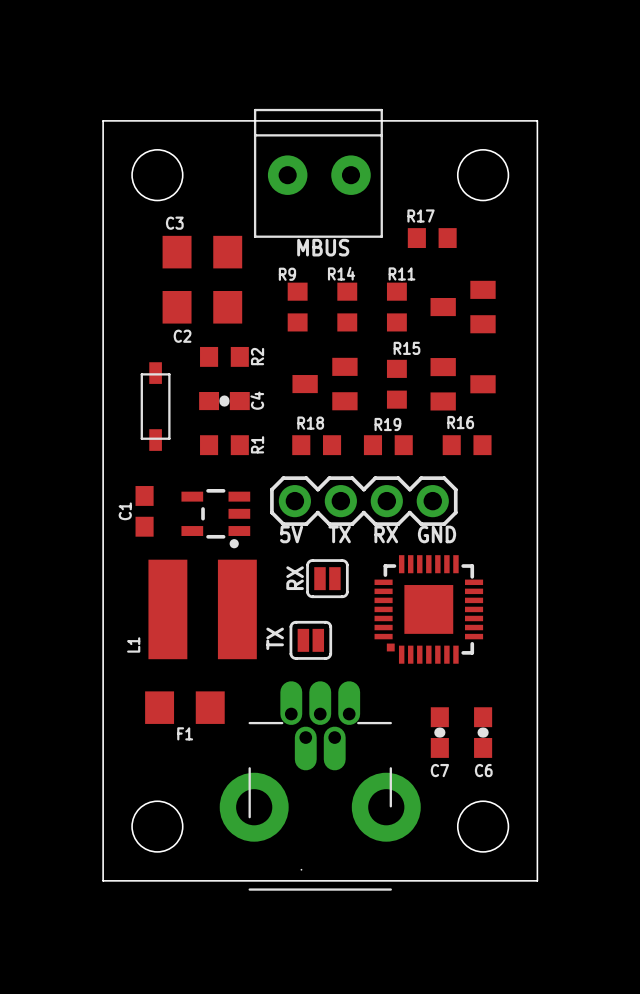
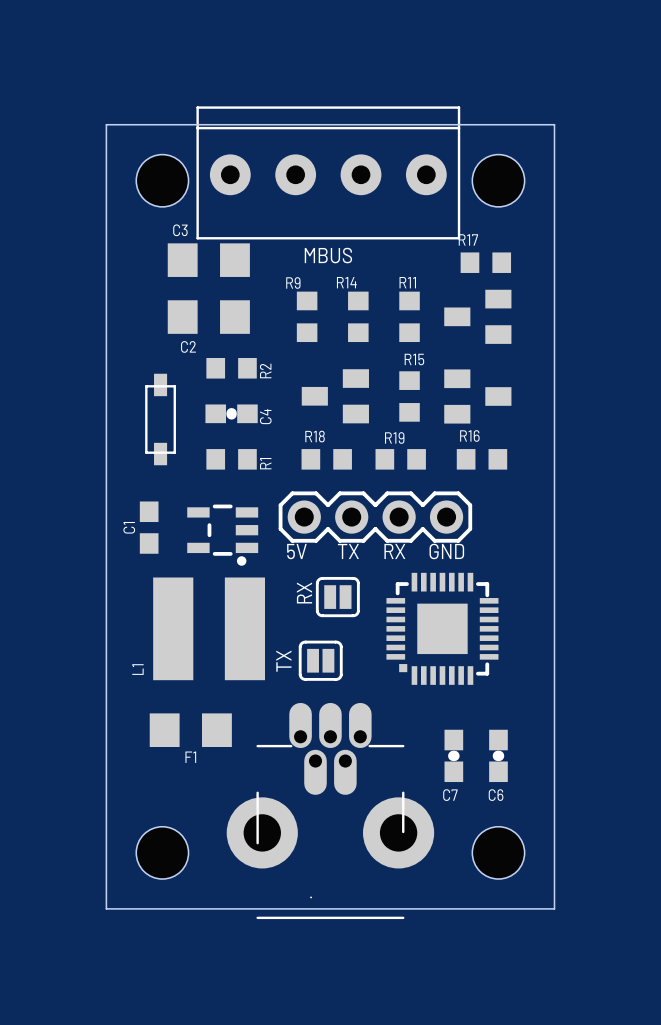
part footprint: [253, 108, 383, 238] -> [196, 106, 461, 240]
R17 position: (432, 238) -> (485, 262)

